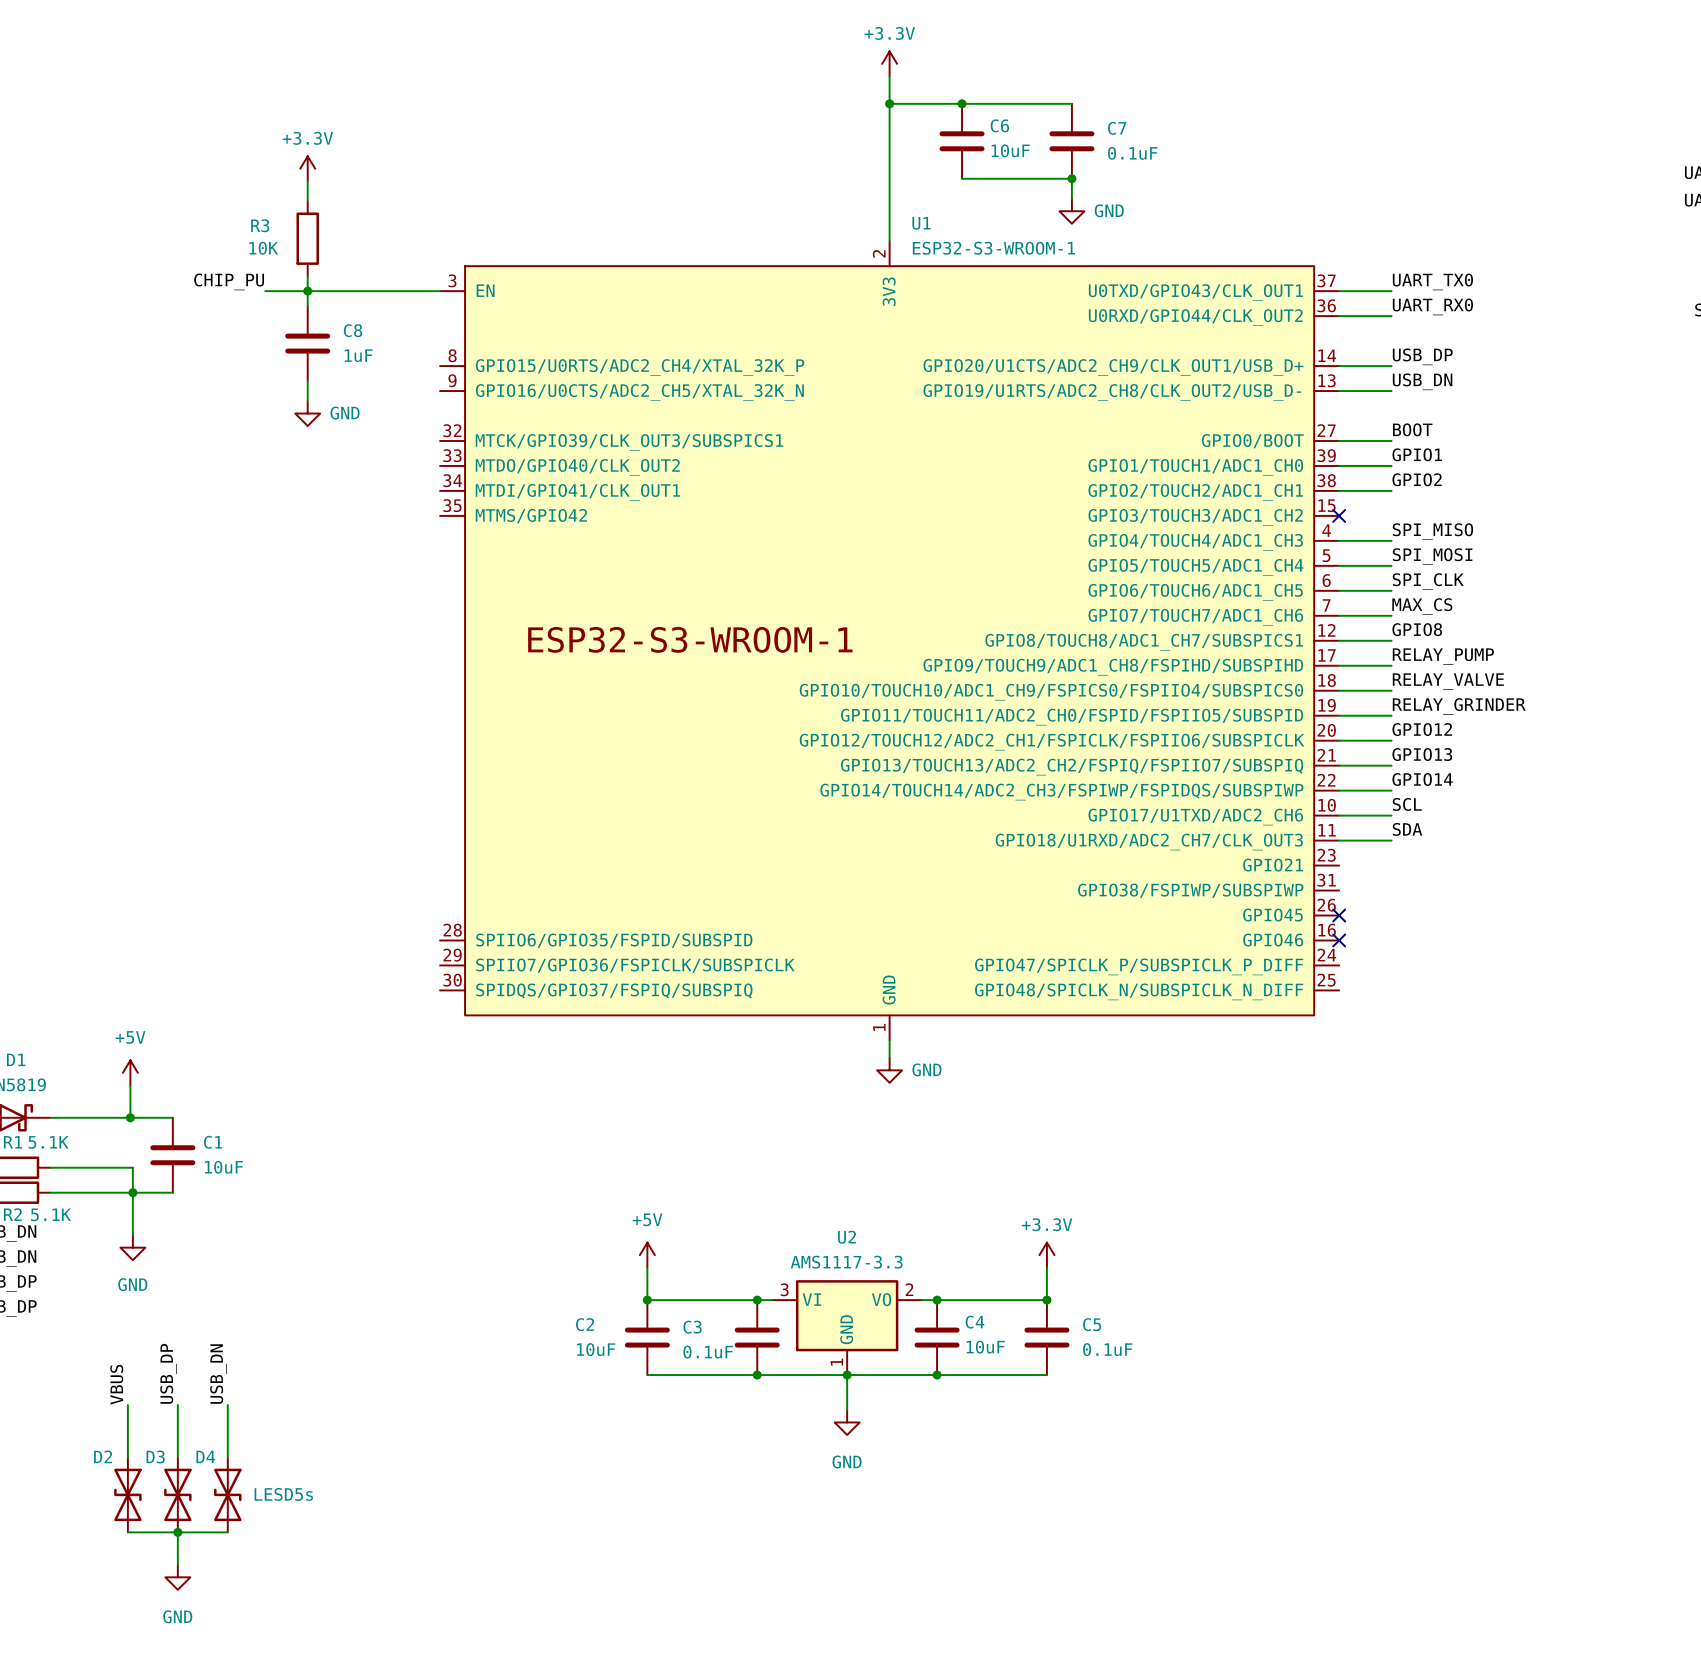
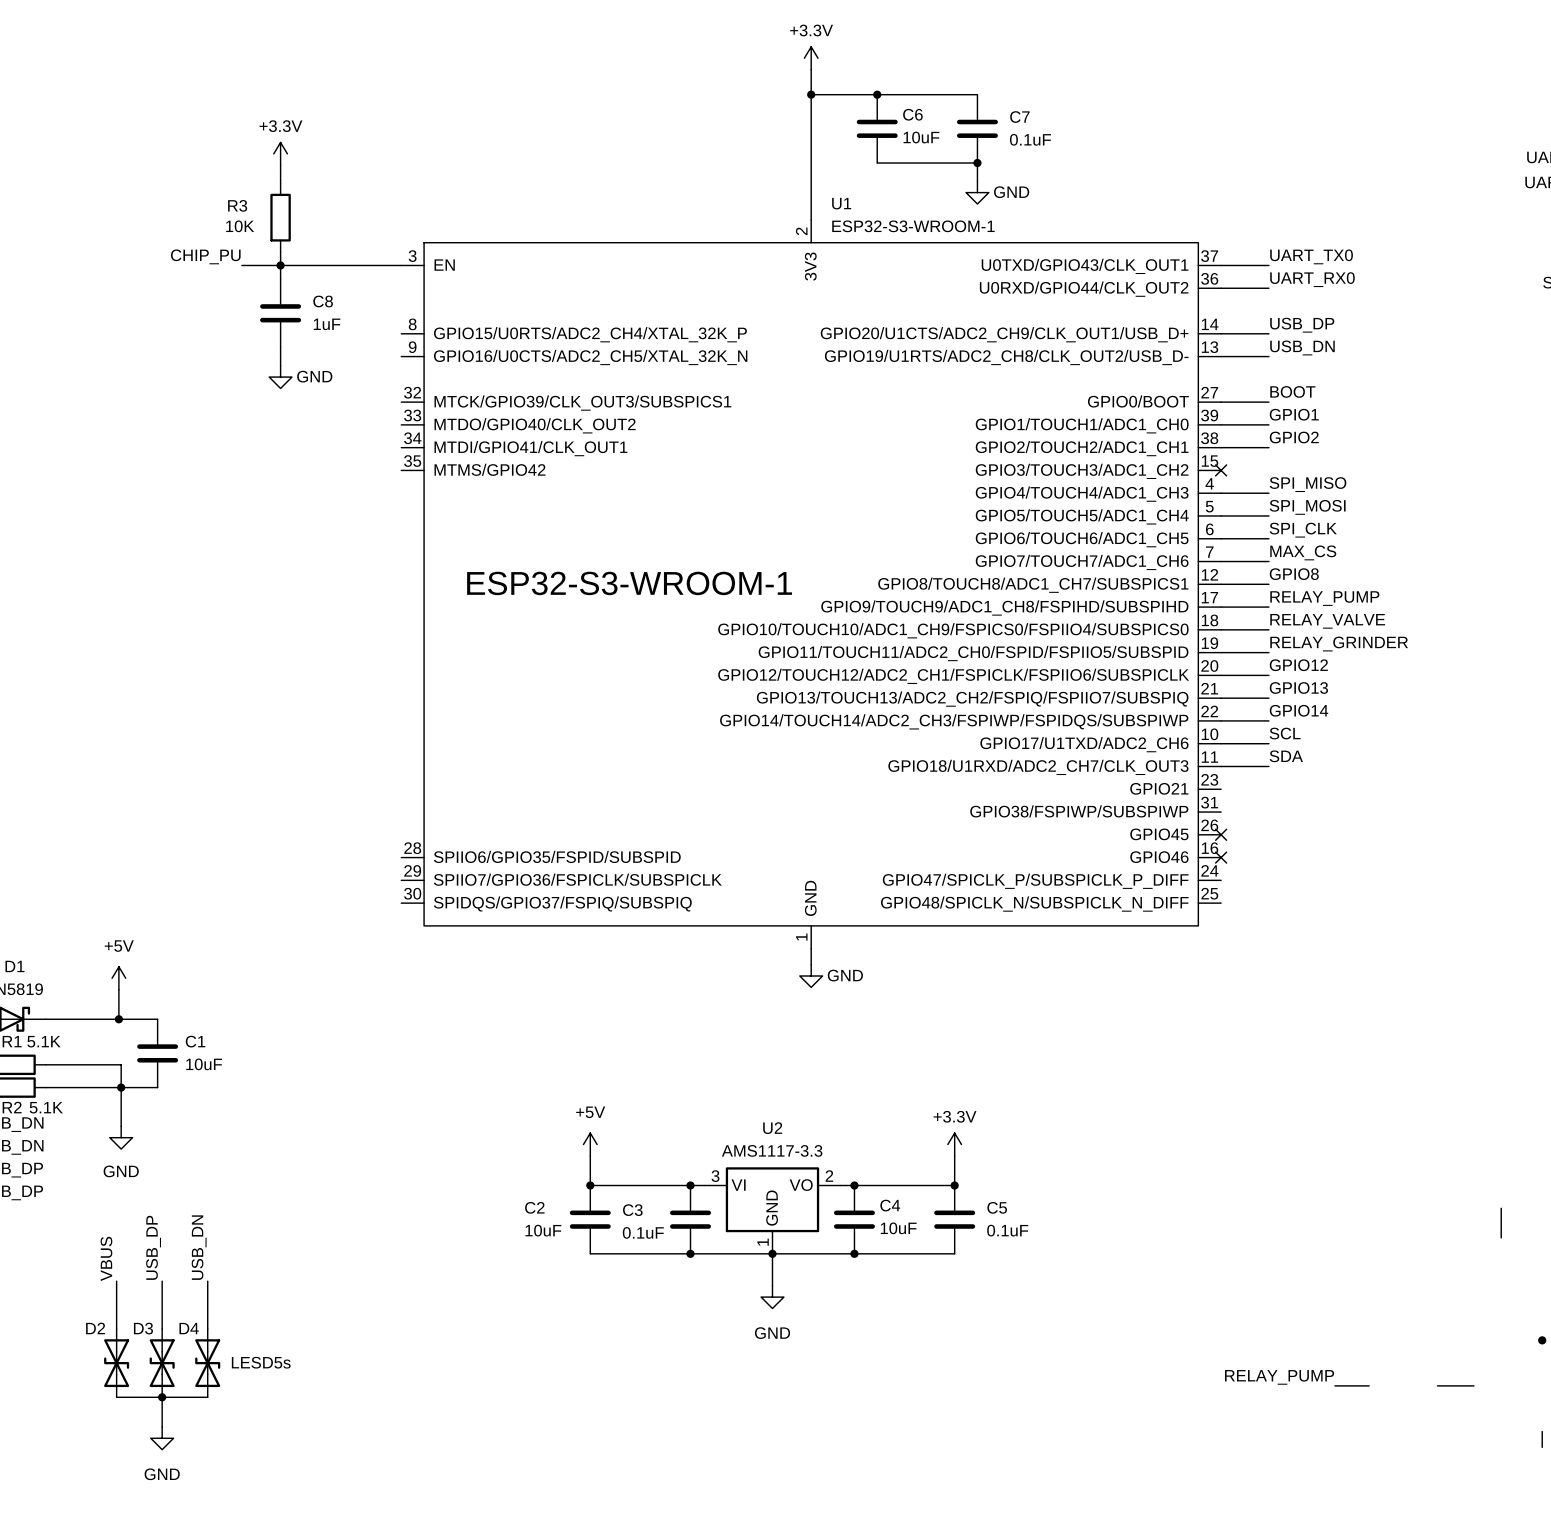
wire: none -> (1501, 1208) (1501, 1237)
junction: none -> (1542, 1340)
label: none -> RELAY_PUMP (1279, 1377)
wire: none -> (1334, 1385) (1369, 1385)
wire: none -> (1437, 1385) (1473, 1385)
wire: none -> (1542, 1431) (1542, 1447)

